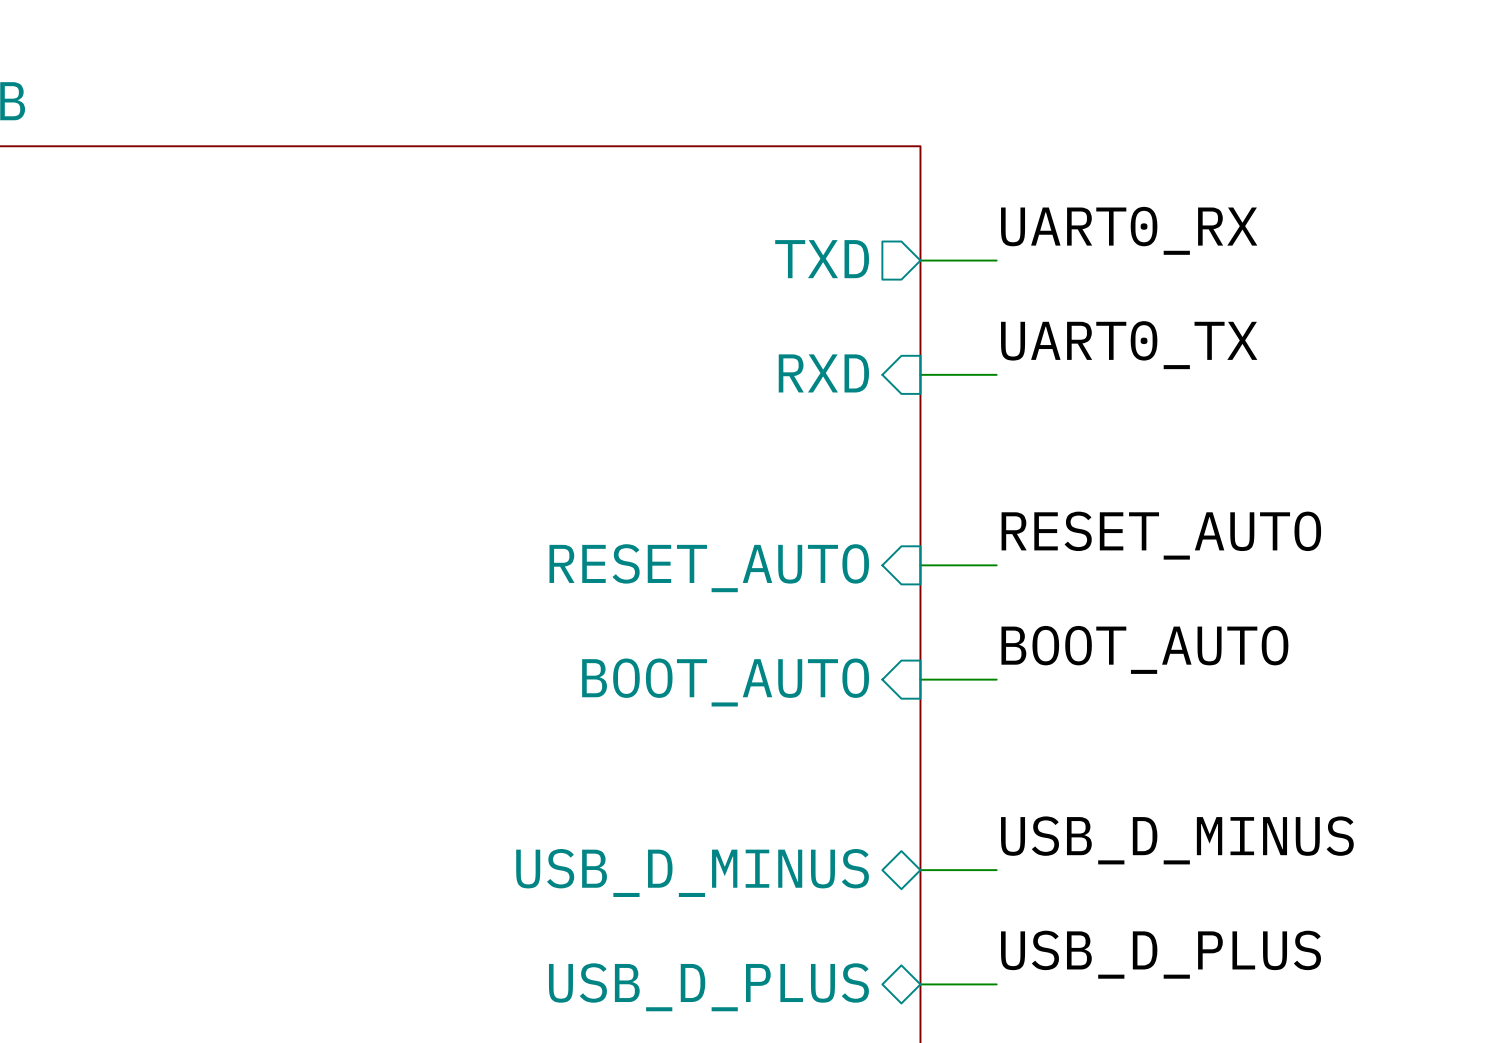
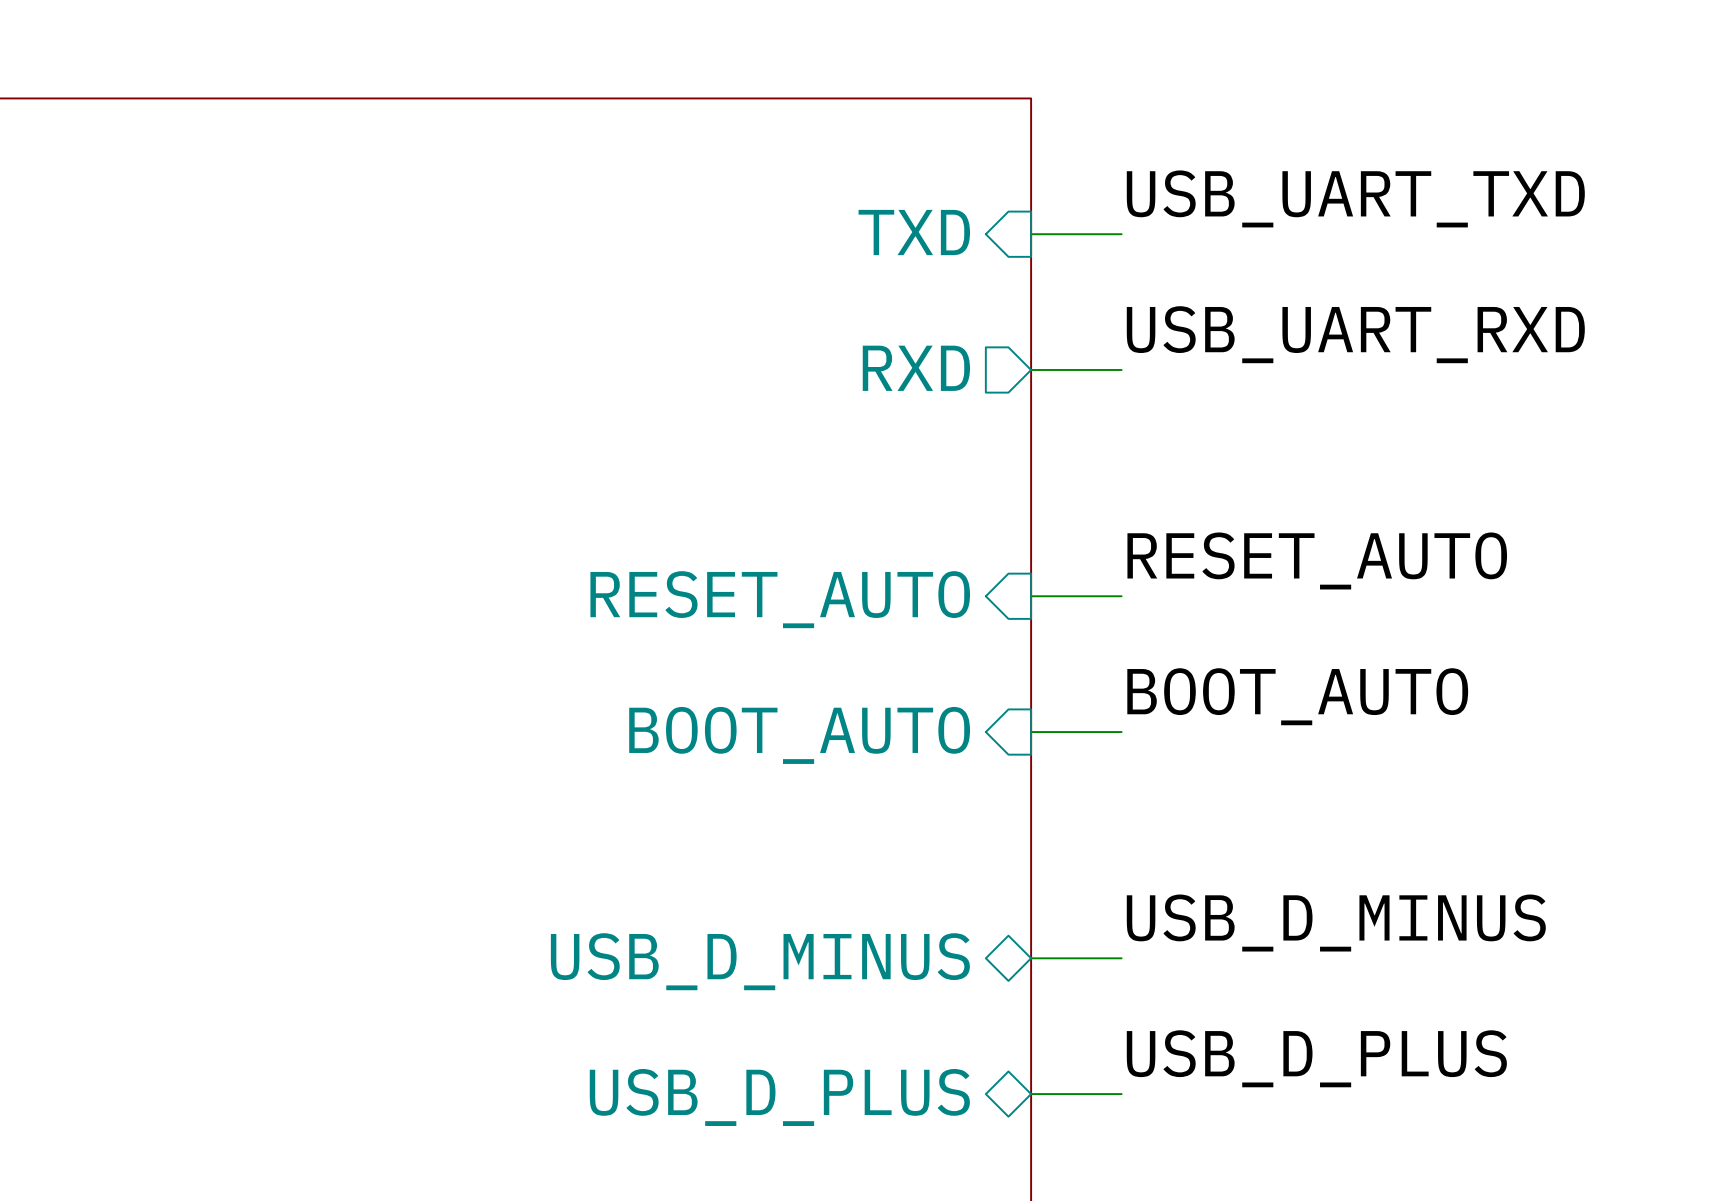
label: UART0_RX (1129, 230) -> USB_UART_TXD (1355, 198)
sheet pin shape: output (822, 259) -> input (914, 232)
label: UART0_TX (1129, 345) -> USB_UART_RXD (1355, 334)
sheet pin shape: input (823, 373) -> output (916, 368)

